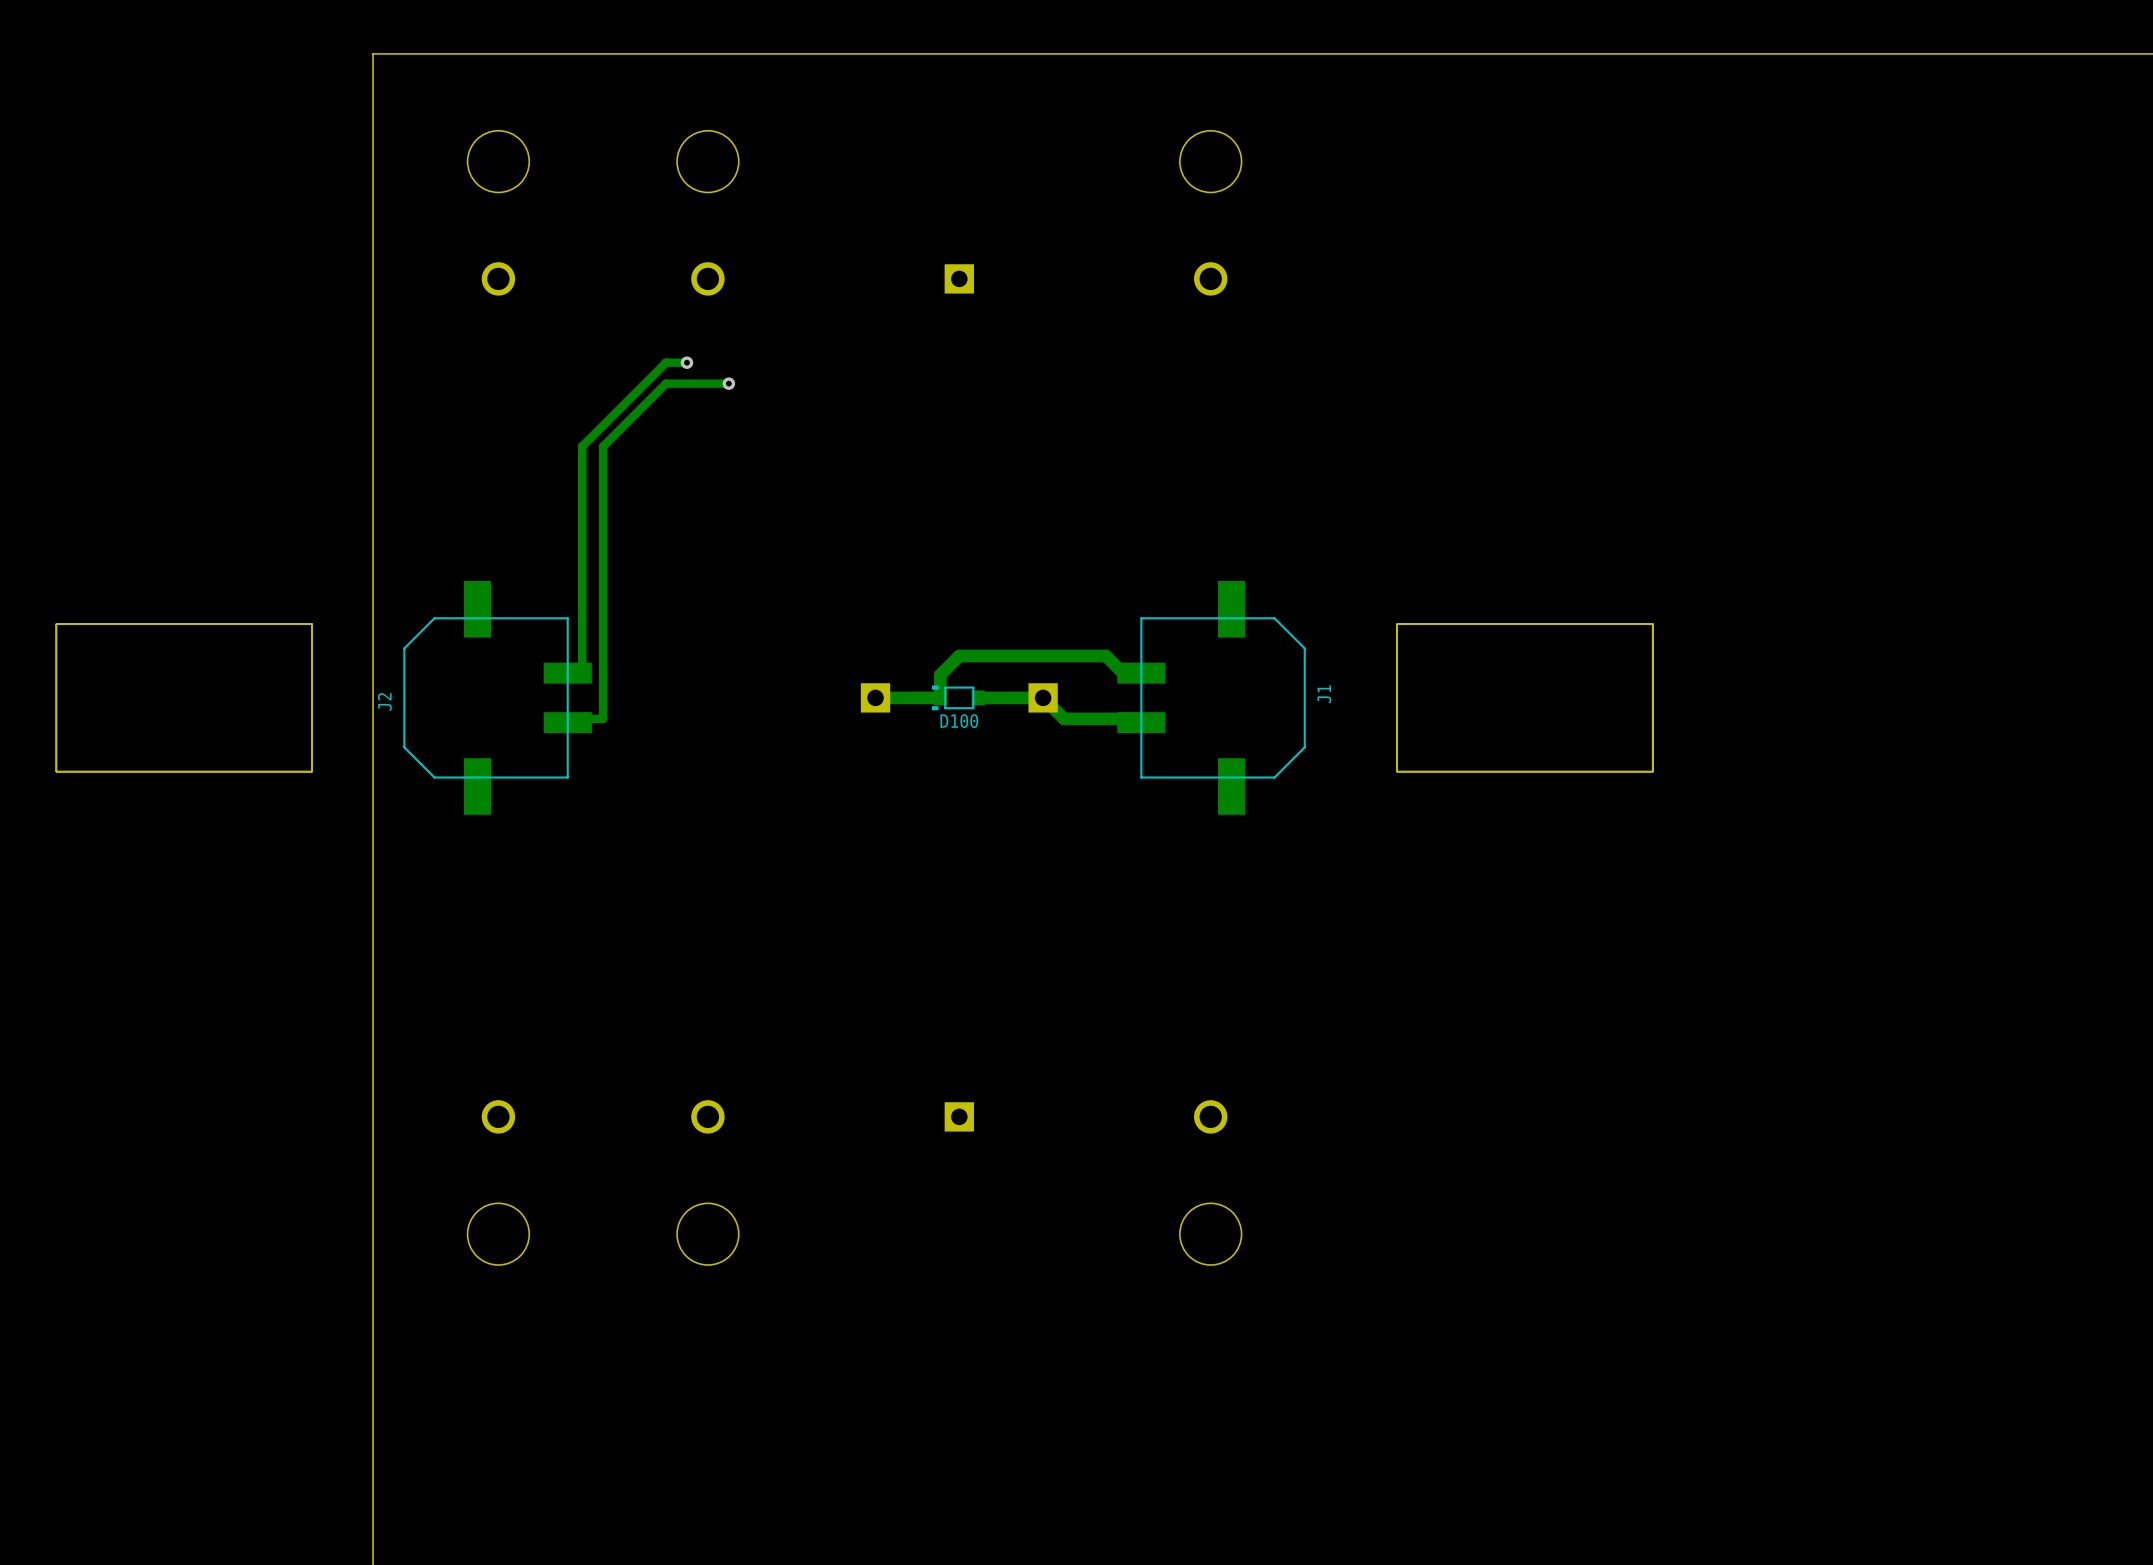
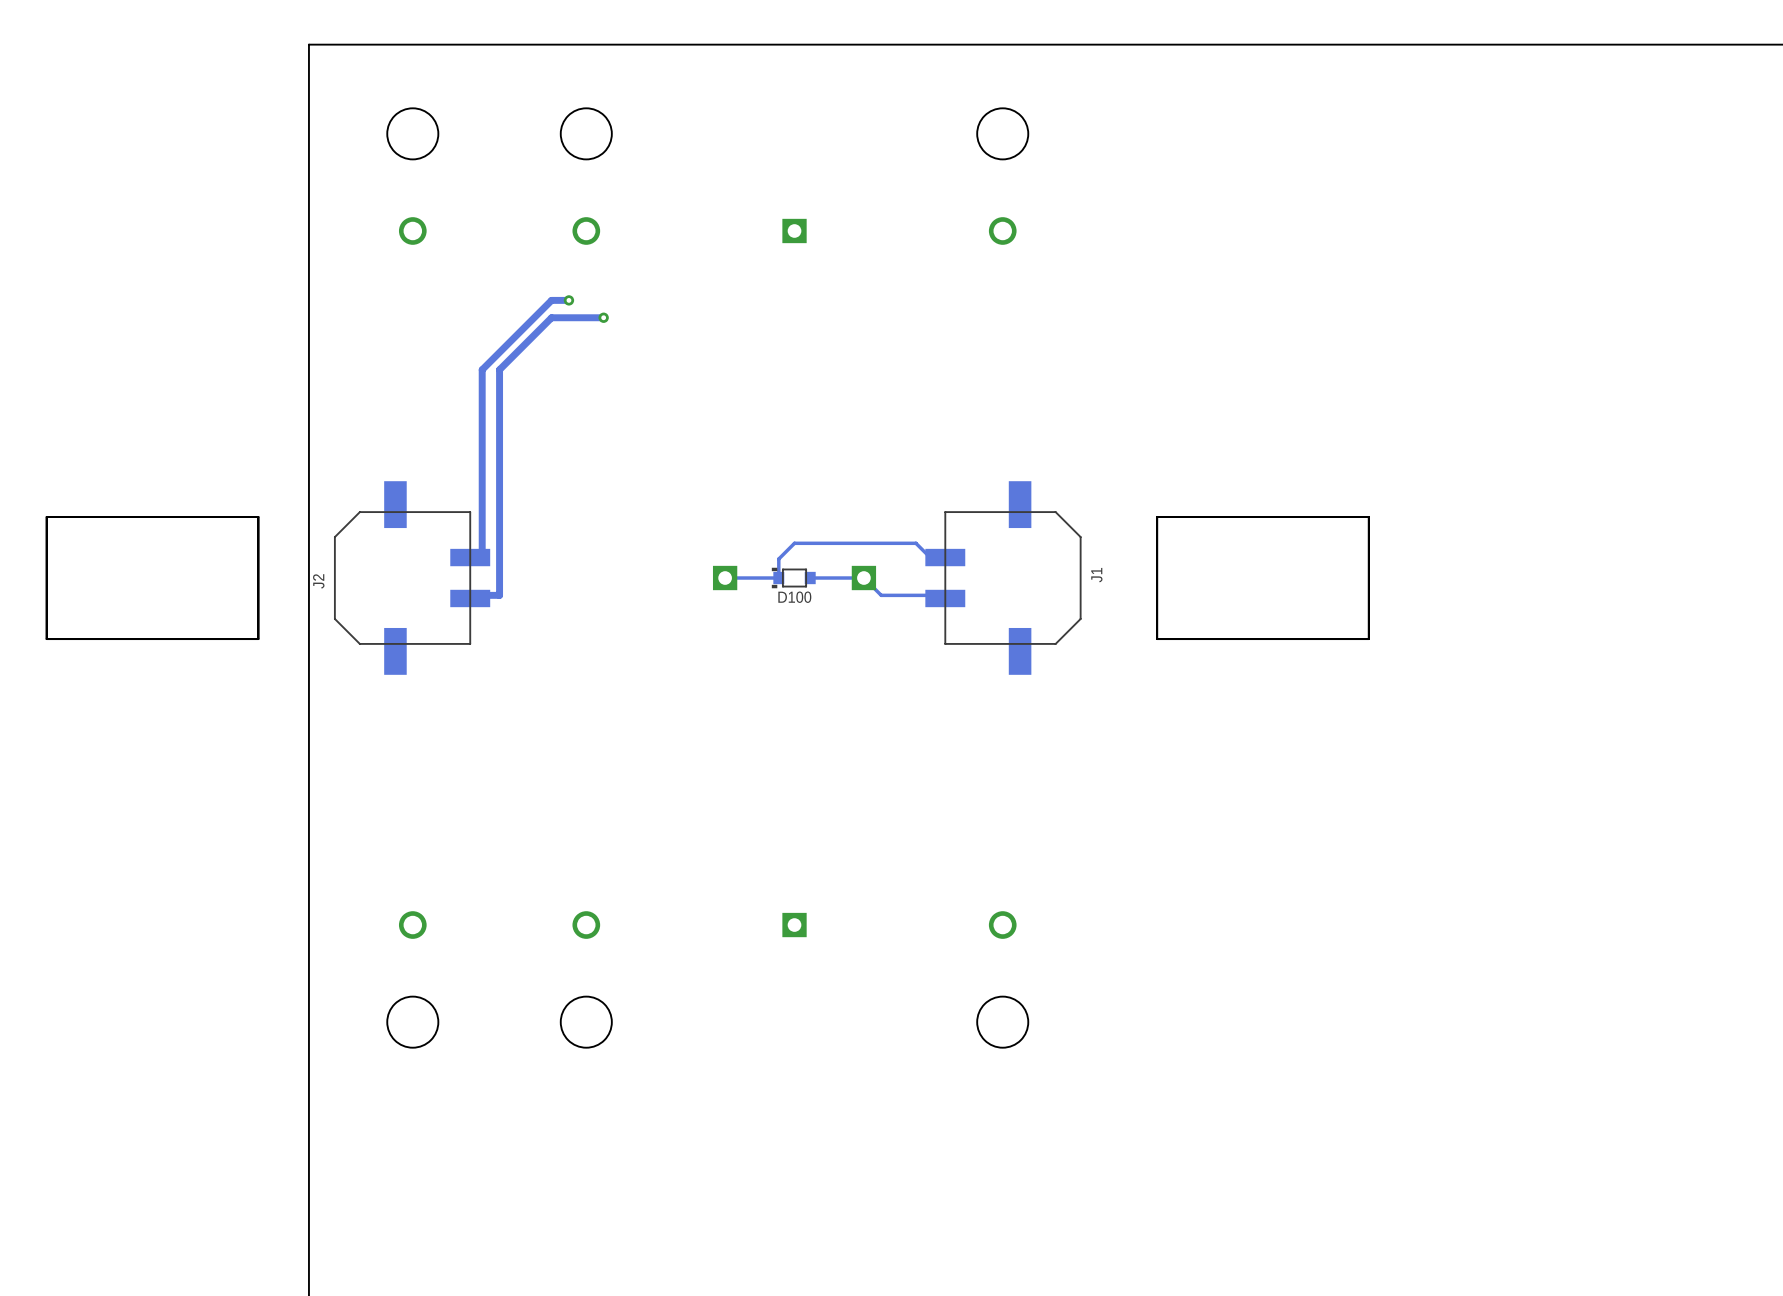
track width: thick (1123, 673) (1105, 656) (959, 656) (940, 674) (940, 697) (875, 697) -> thin (930, 557) (915, 543) (794, 543) (778, 559) (778, 578) (725, 578)
track width: thick (978, 697) (1043, 697) (1064, 718) (1137, 718) -> thin (810, 578) (863, 578) (881, 595) (942, 595)

